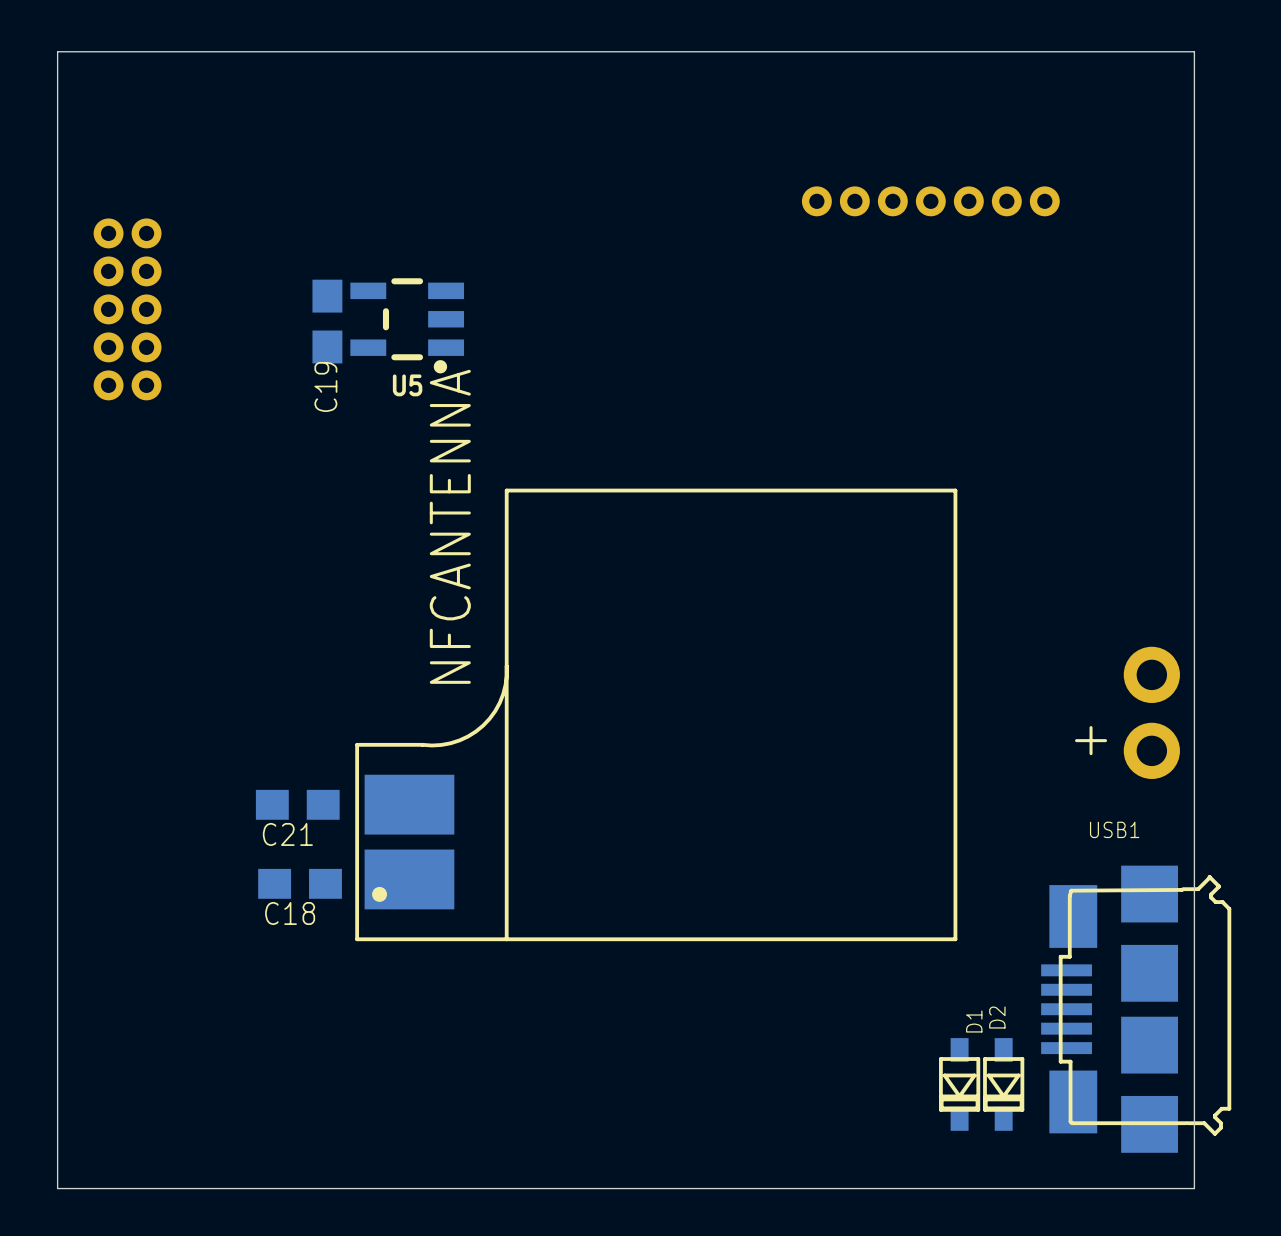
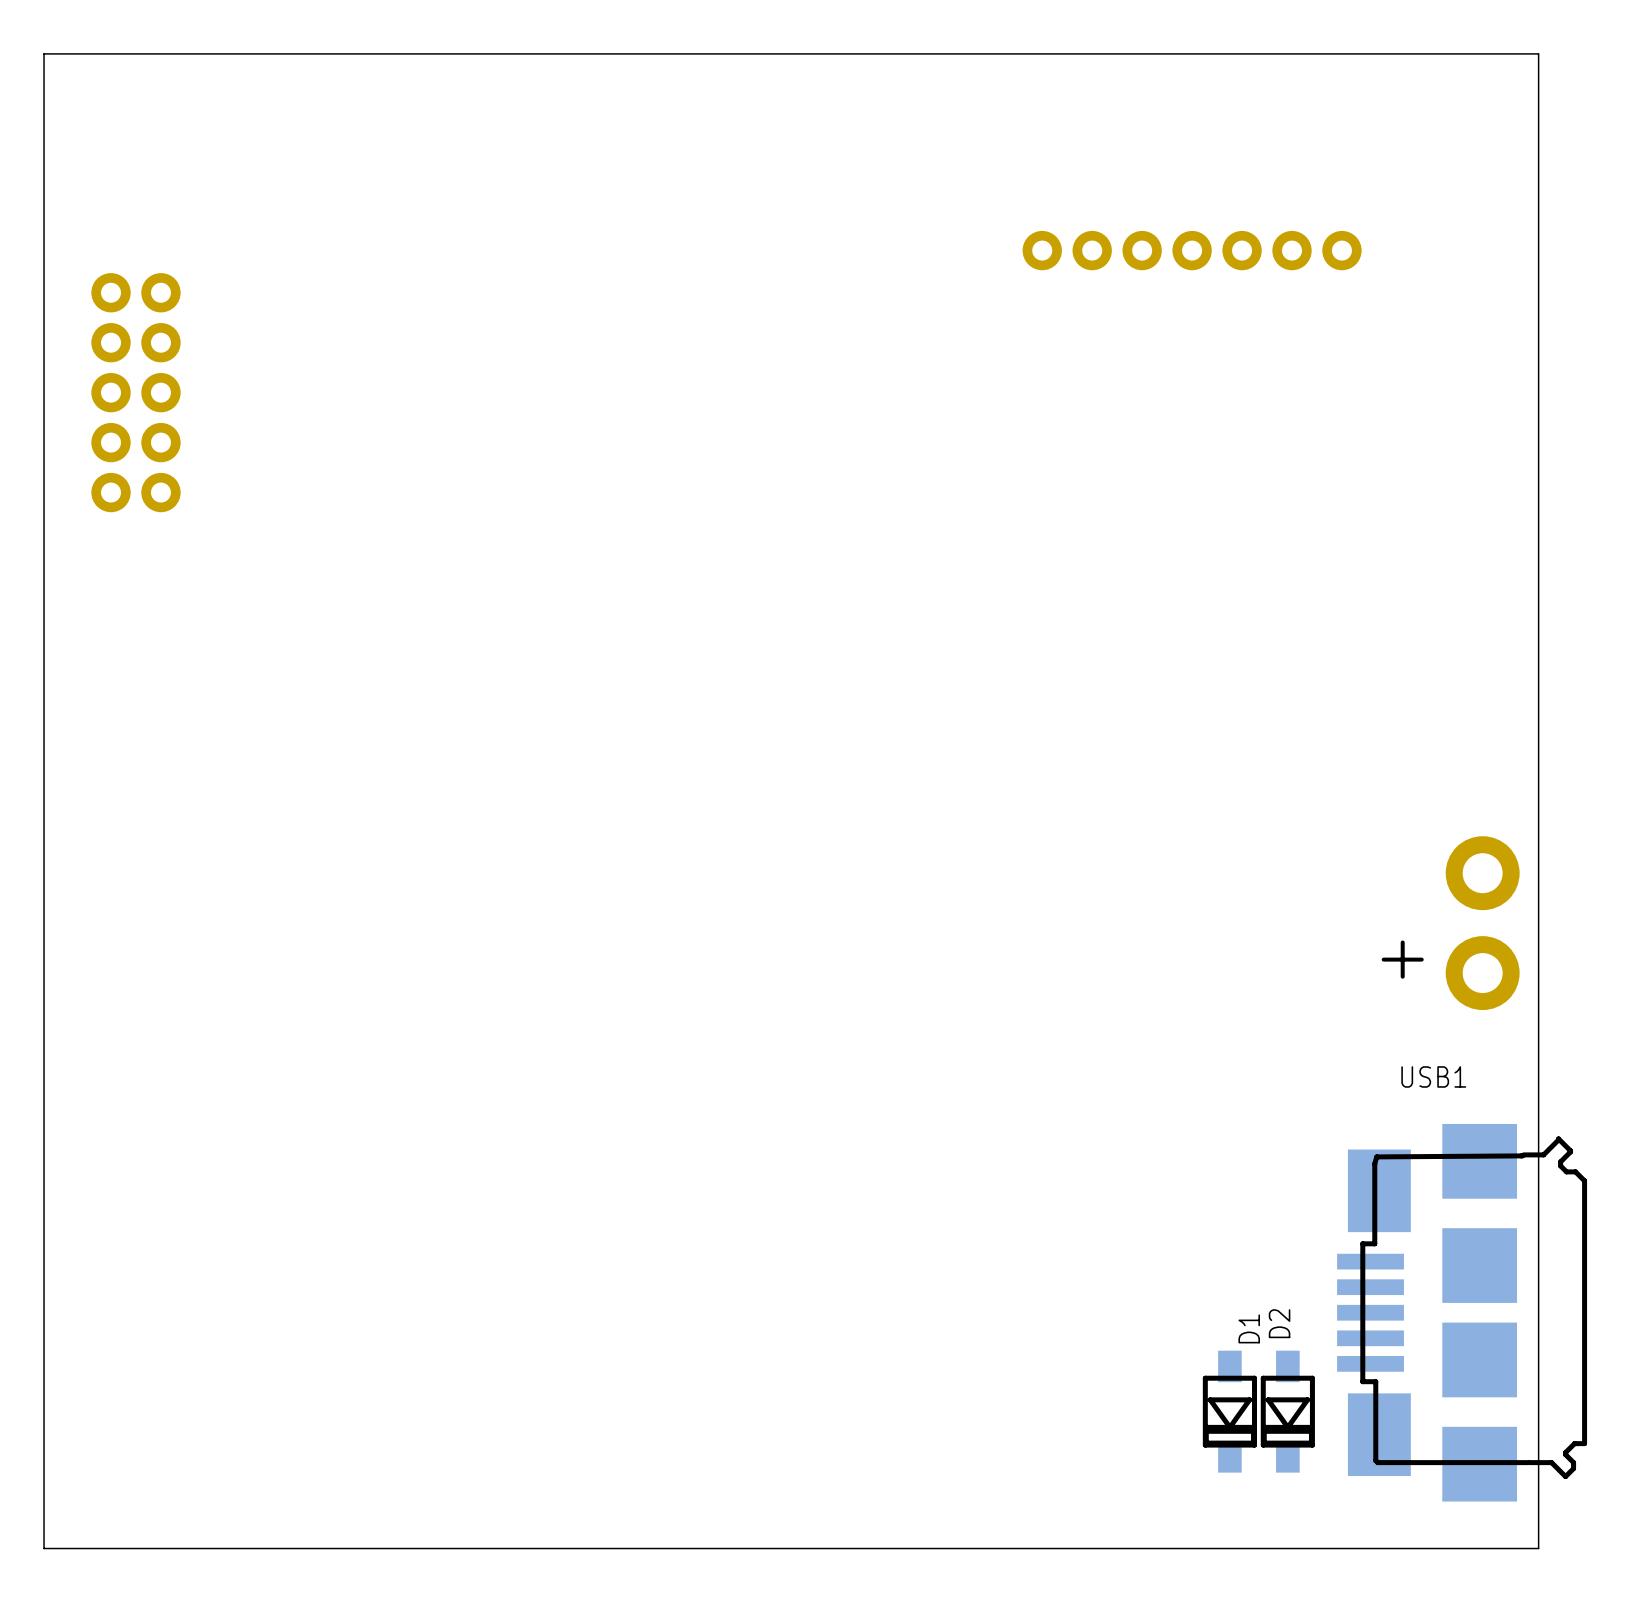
C19: (327, 321) -> none
U5: (407, 325) -> none
NFCANTENNA: (656, 714) -> none
C21: (297, 804) -> none
C18: (300, 883) -> none

